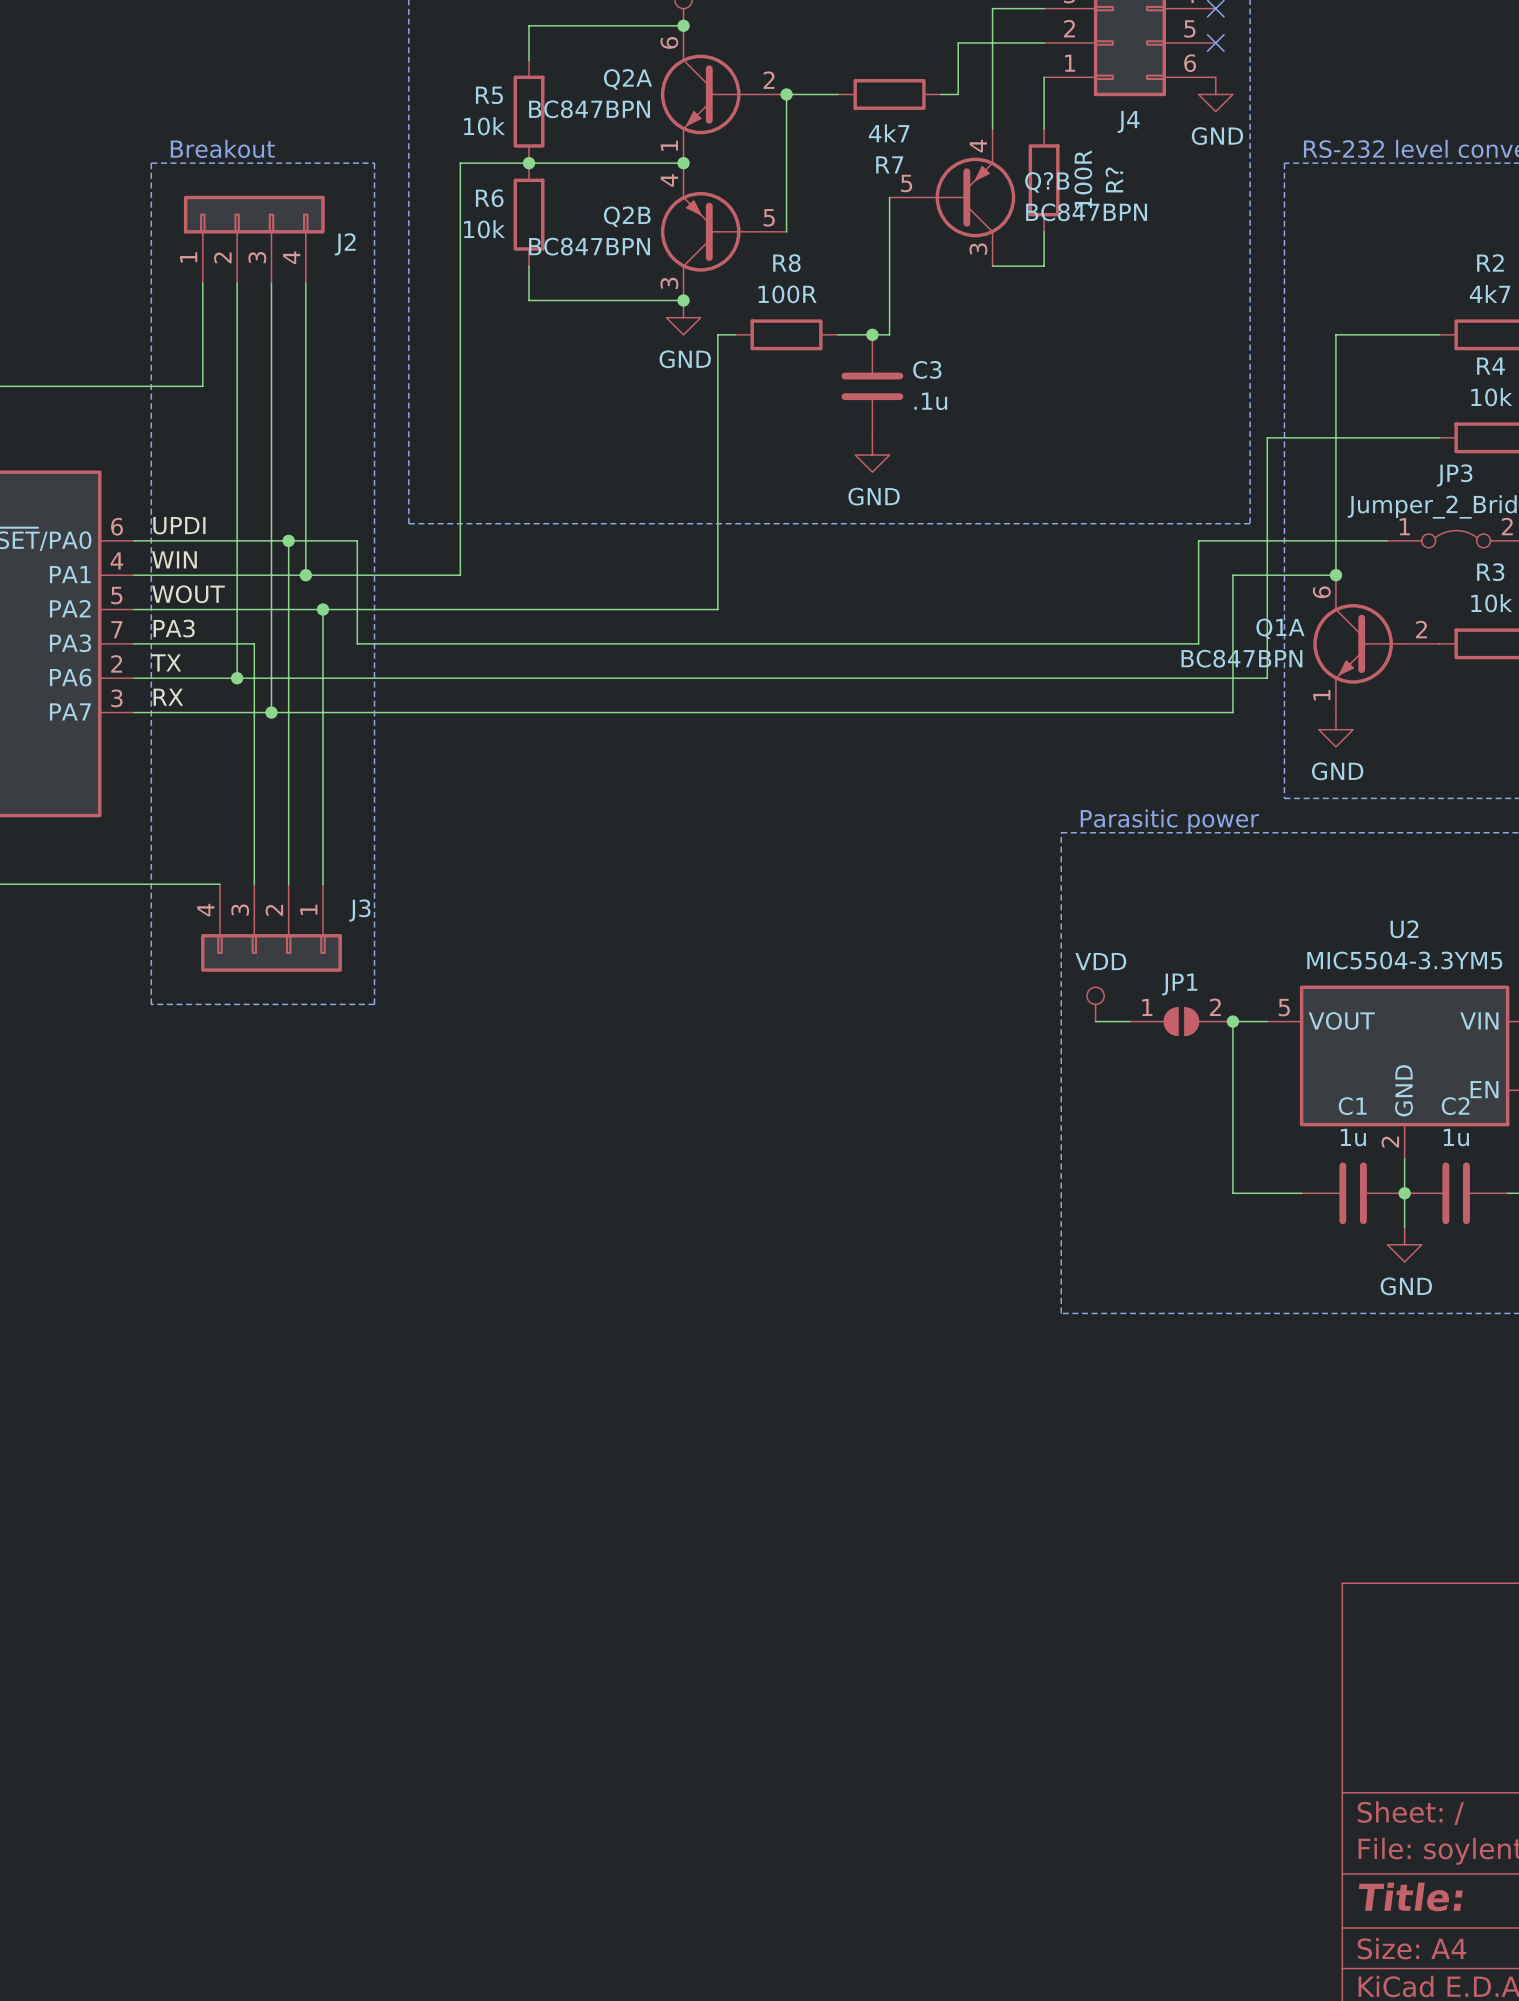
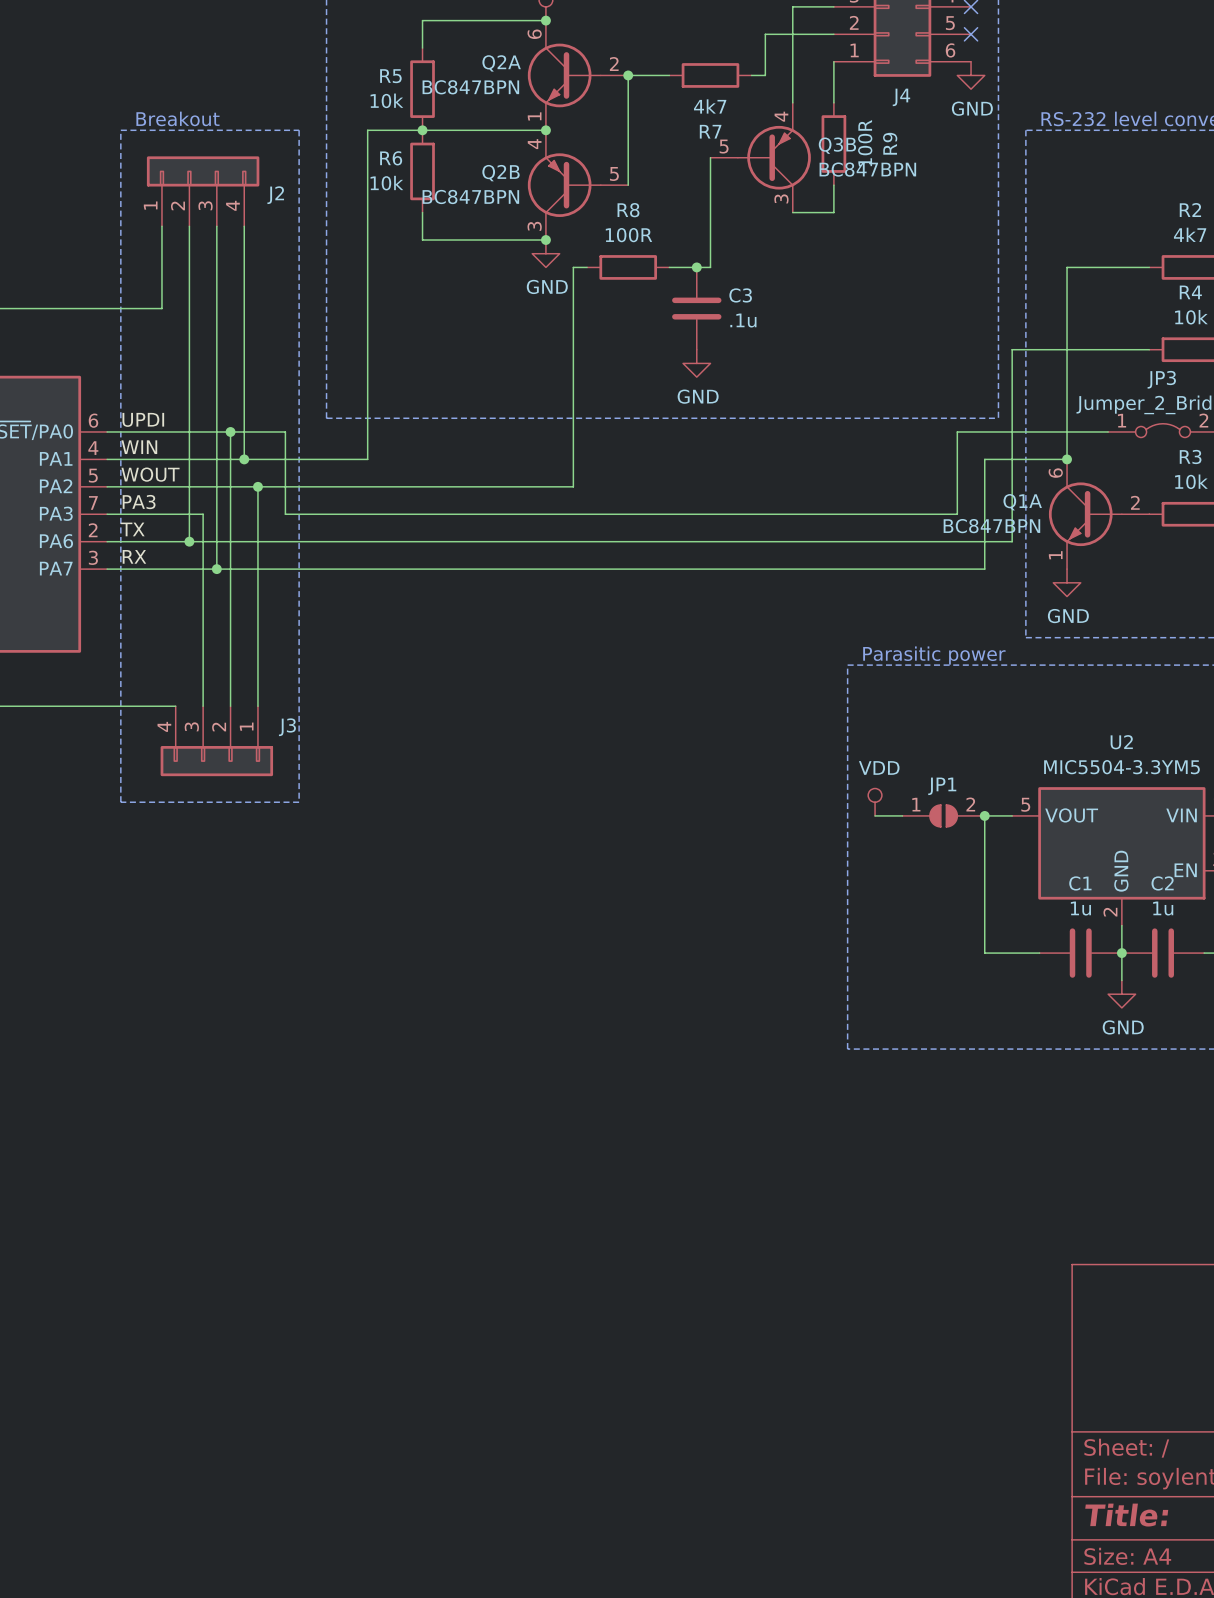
R? name: R? (1114, 179) -> R9 (890, 143)
Q?B name: Q?B (1047, 182) -> Q3B (837, 145)

